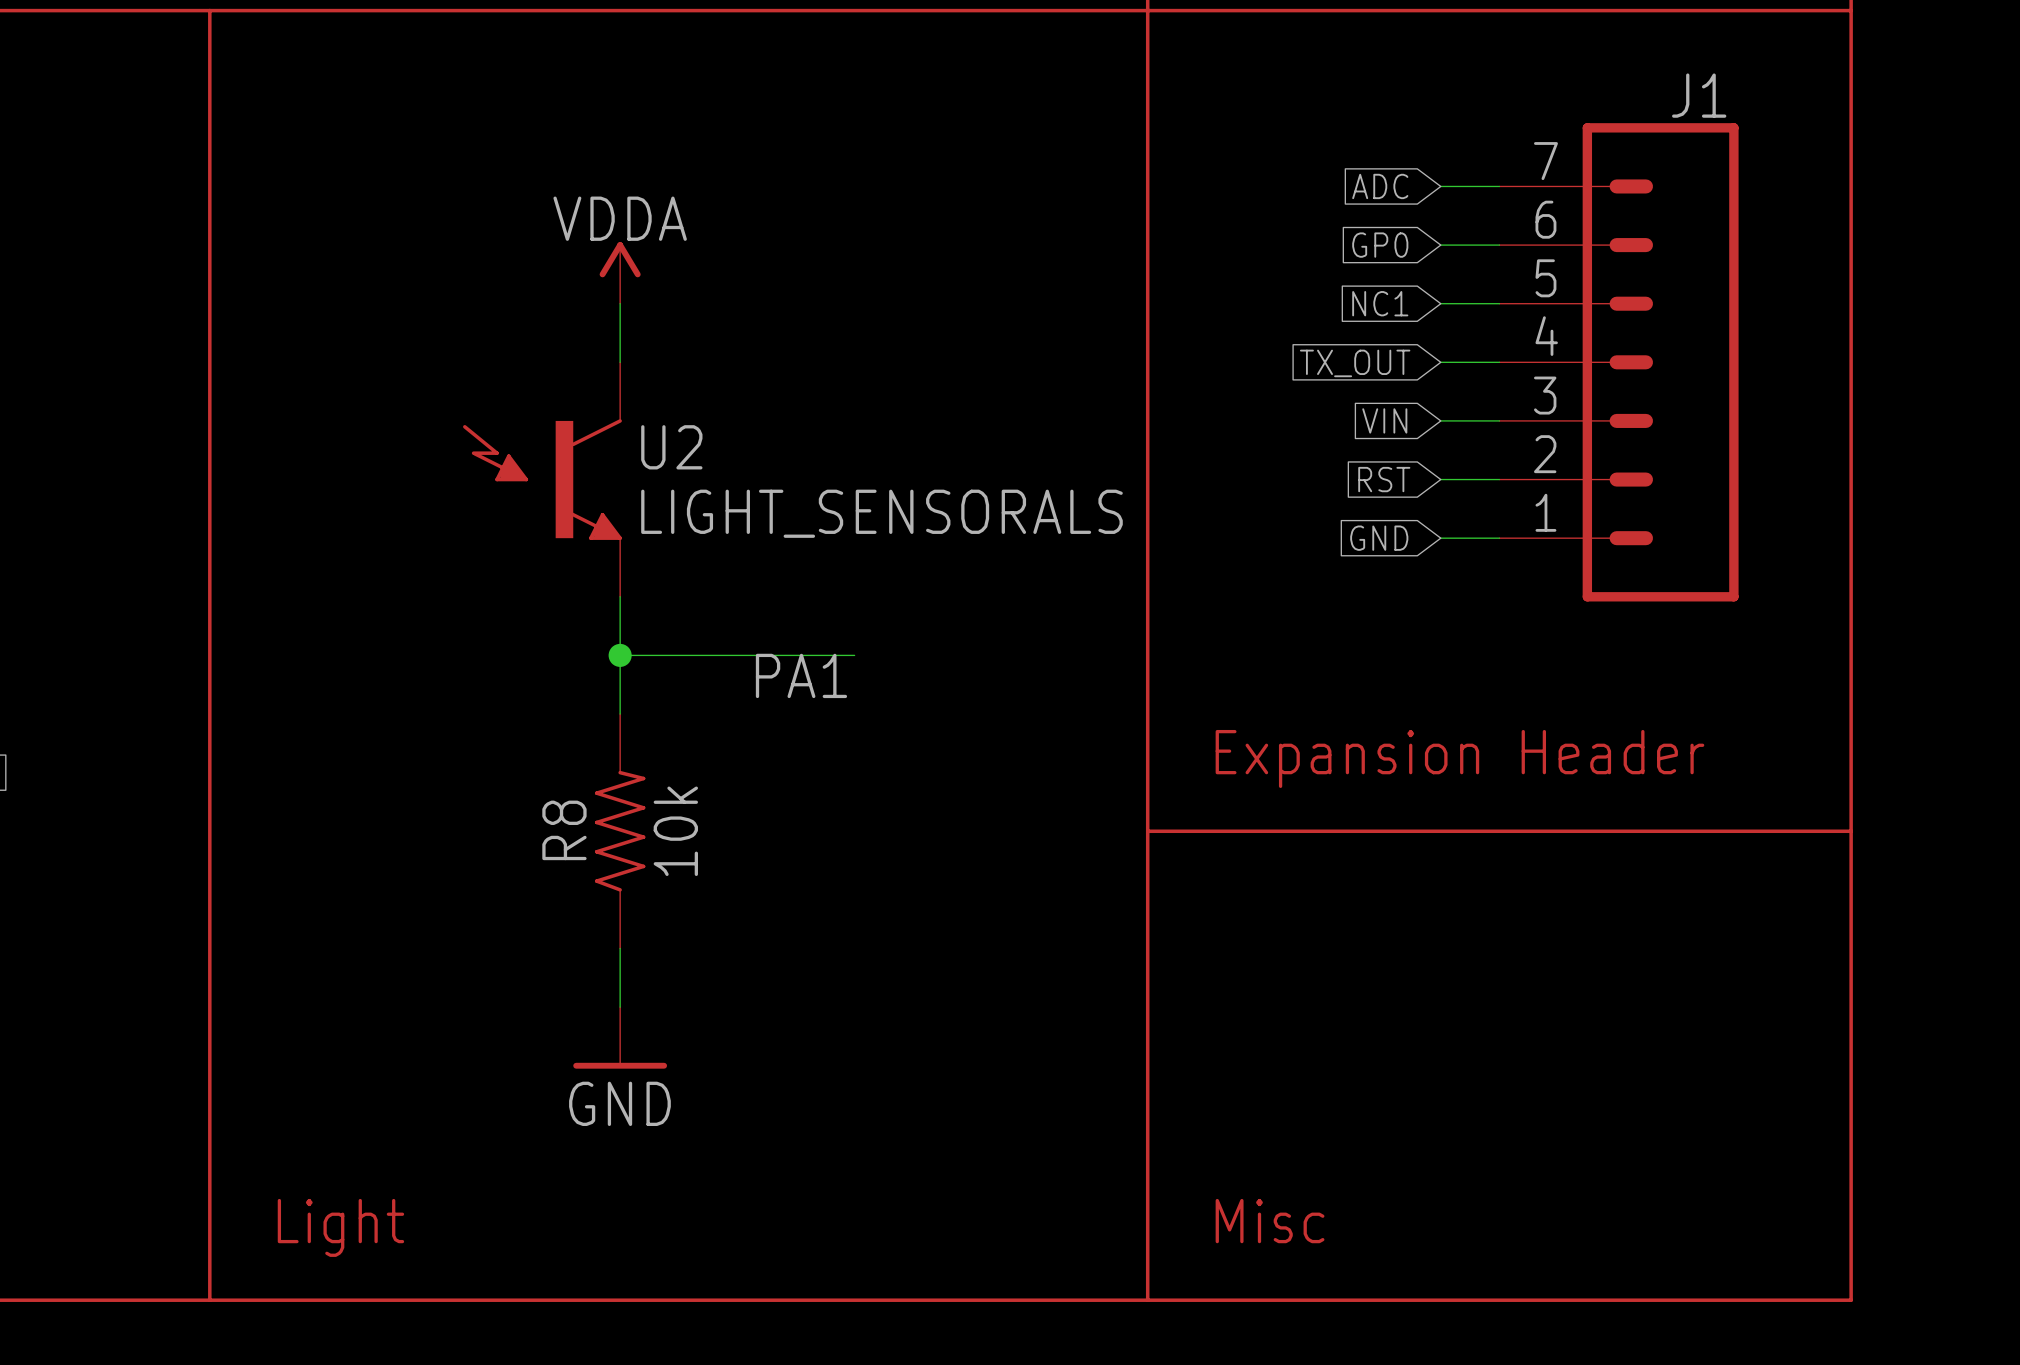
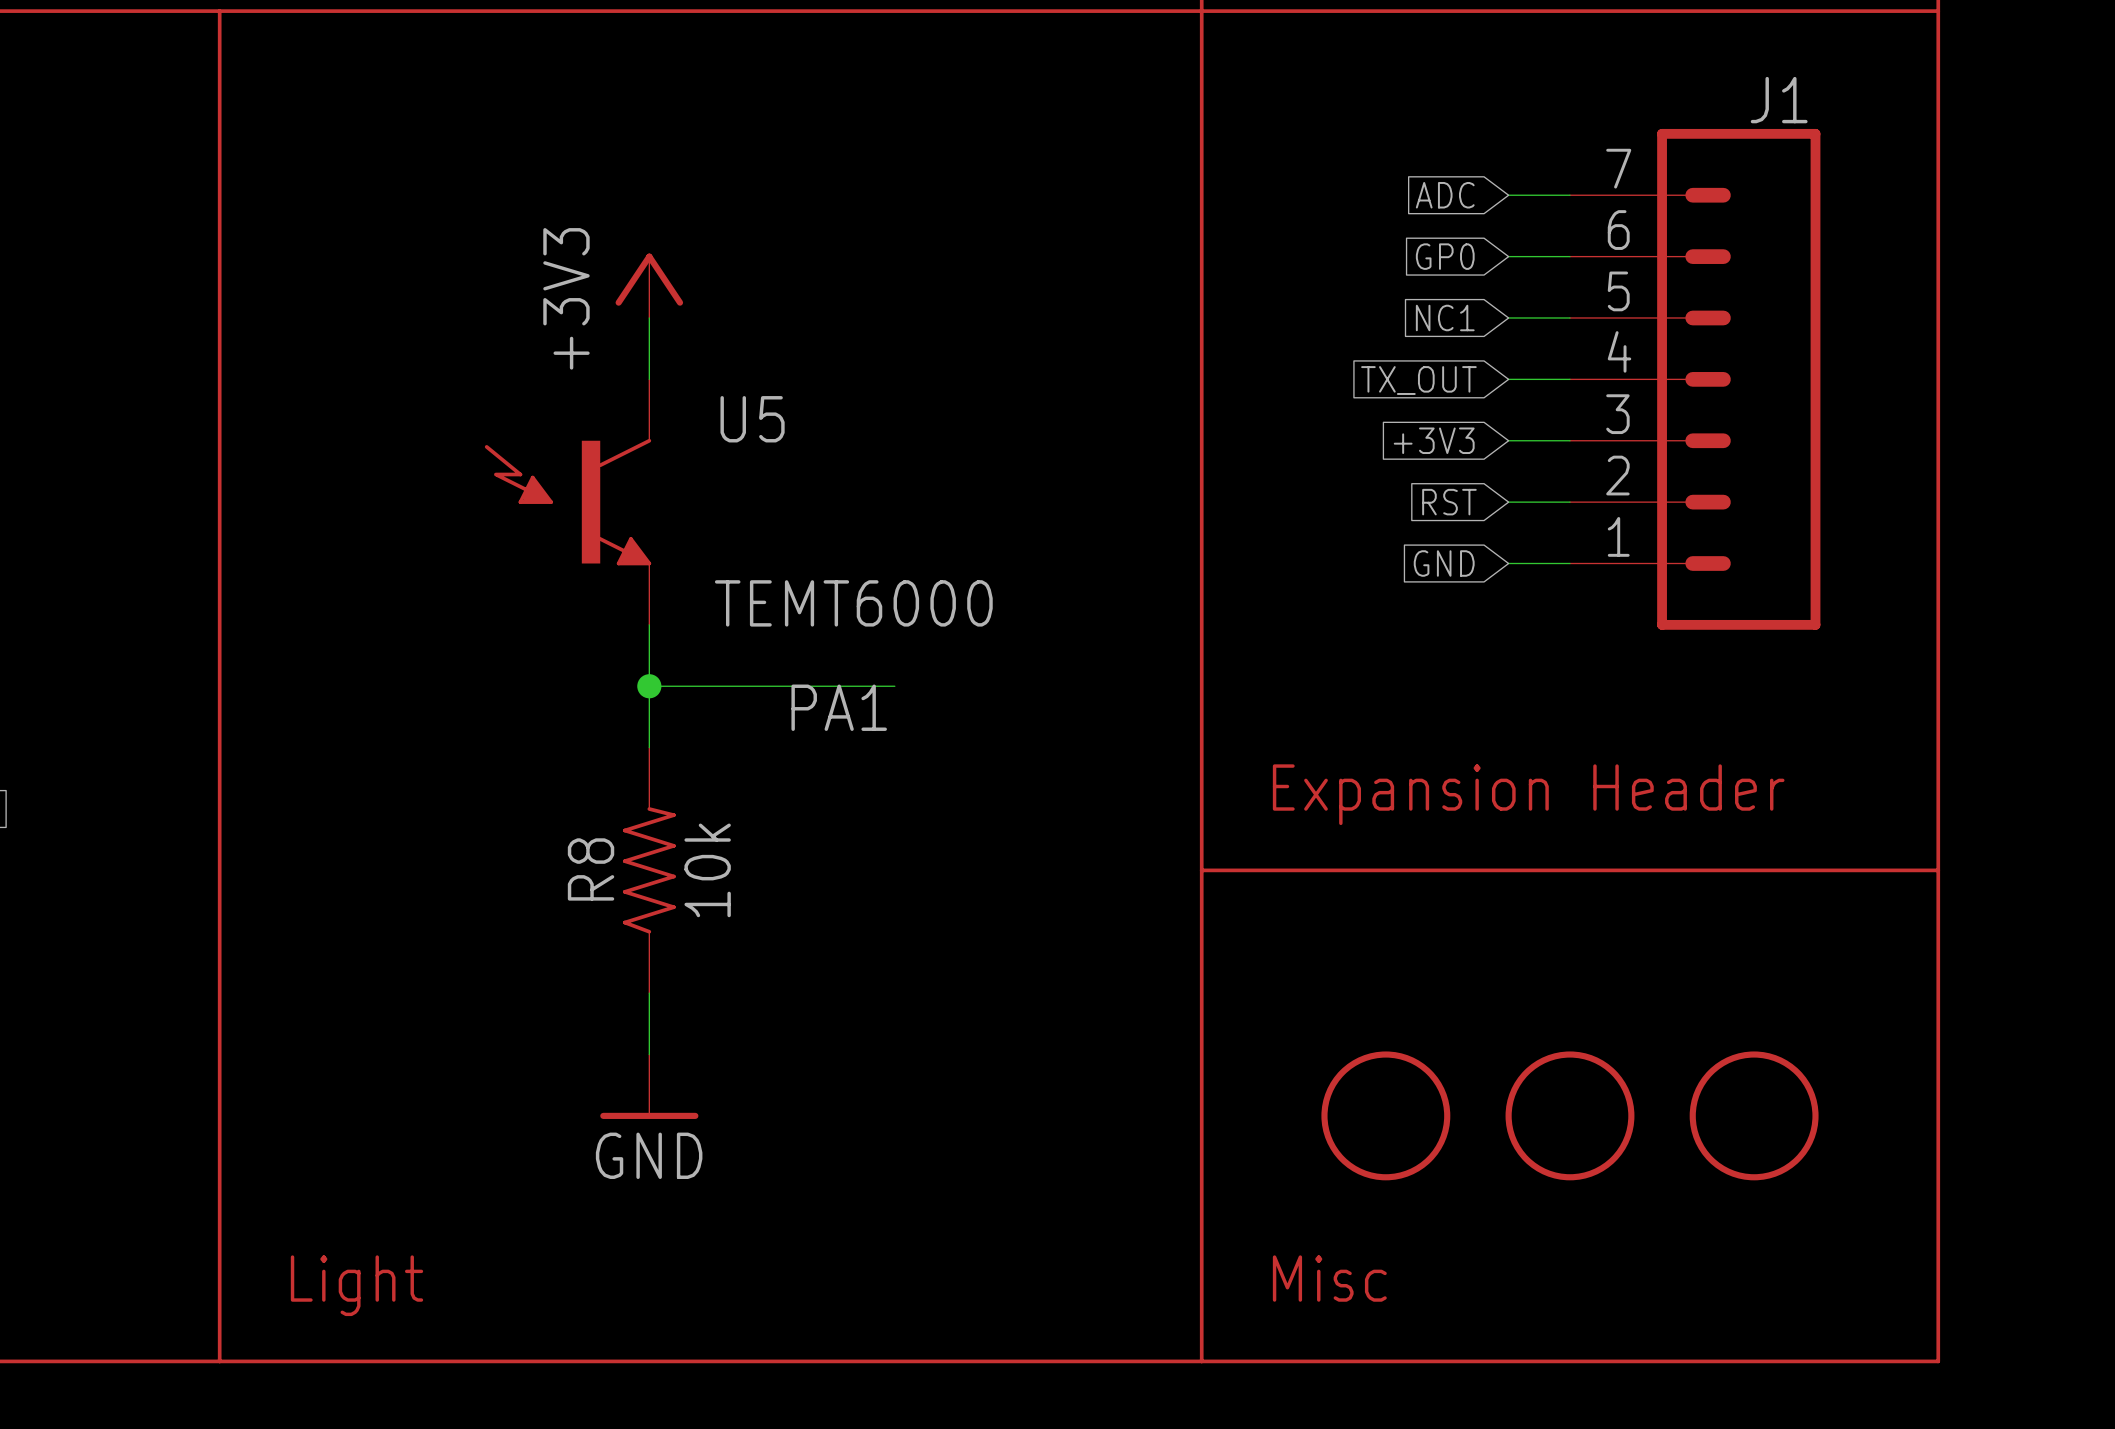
power symbol: VDDA (620, 272) -> +3V3 (649, 285)
global label: VIN (1384, 420) -> +3V3 (1434, 440)
U2 name: U2 (671, 447) -> U5 (752, 419)
U2 value: LIGHT_SENSORALS (881, 513) -> TEMT6000 (853, 603)
part: none -> (1385, 1115)
part: none -> (1569, 1115)
part: none -> (1754, 1115)

